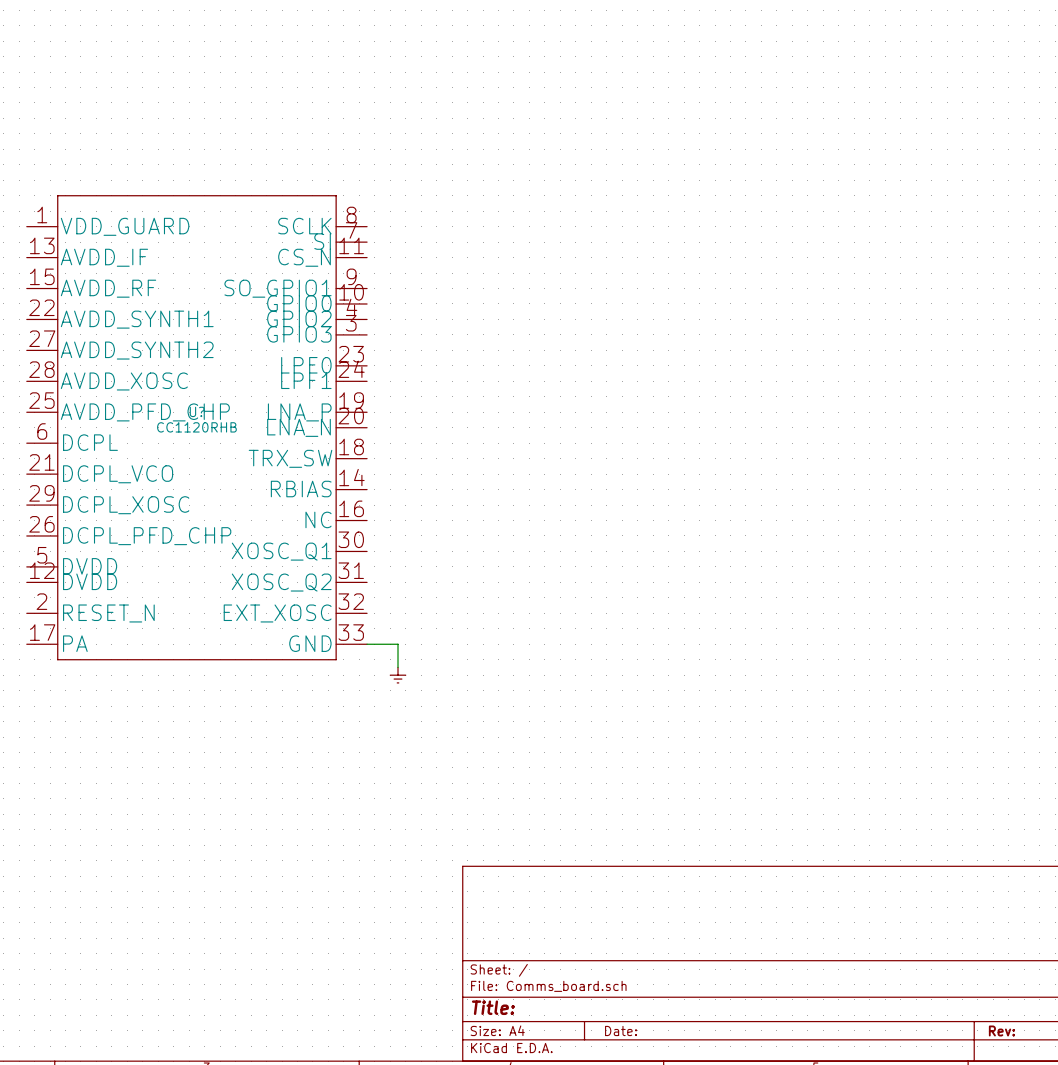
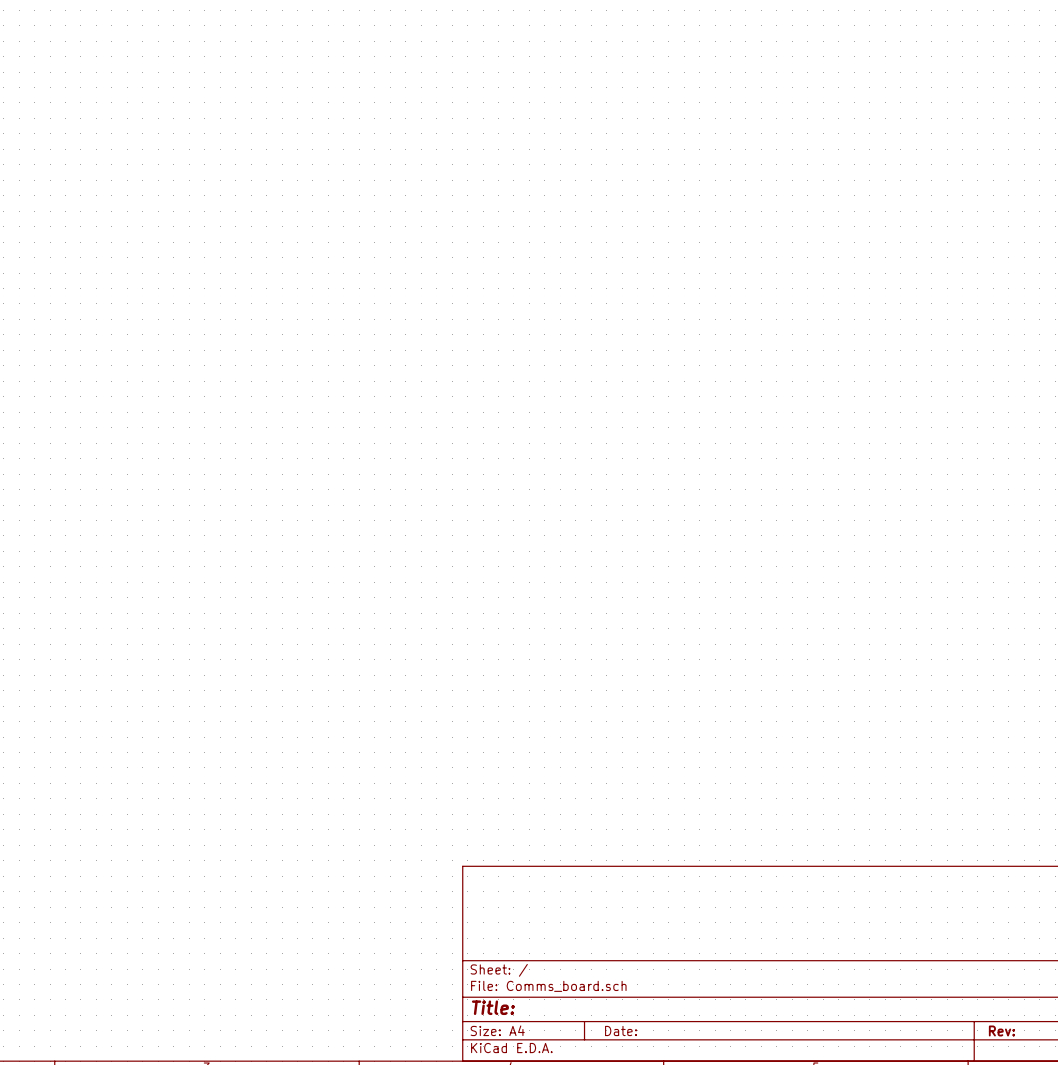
U?: CC1120RHB (196, 427) -> none
wire: (367, 644) (398, 644) (398, 667) -> none
power symbol: (398, 675) -> none

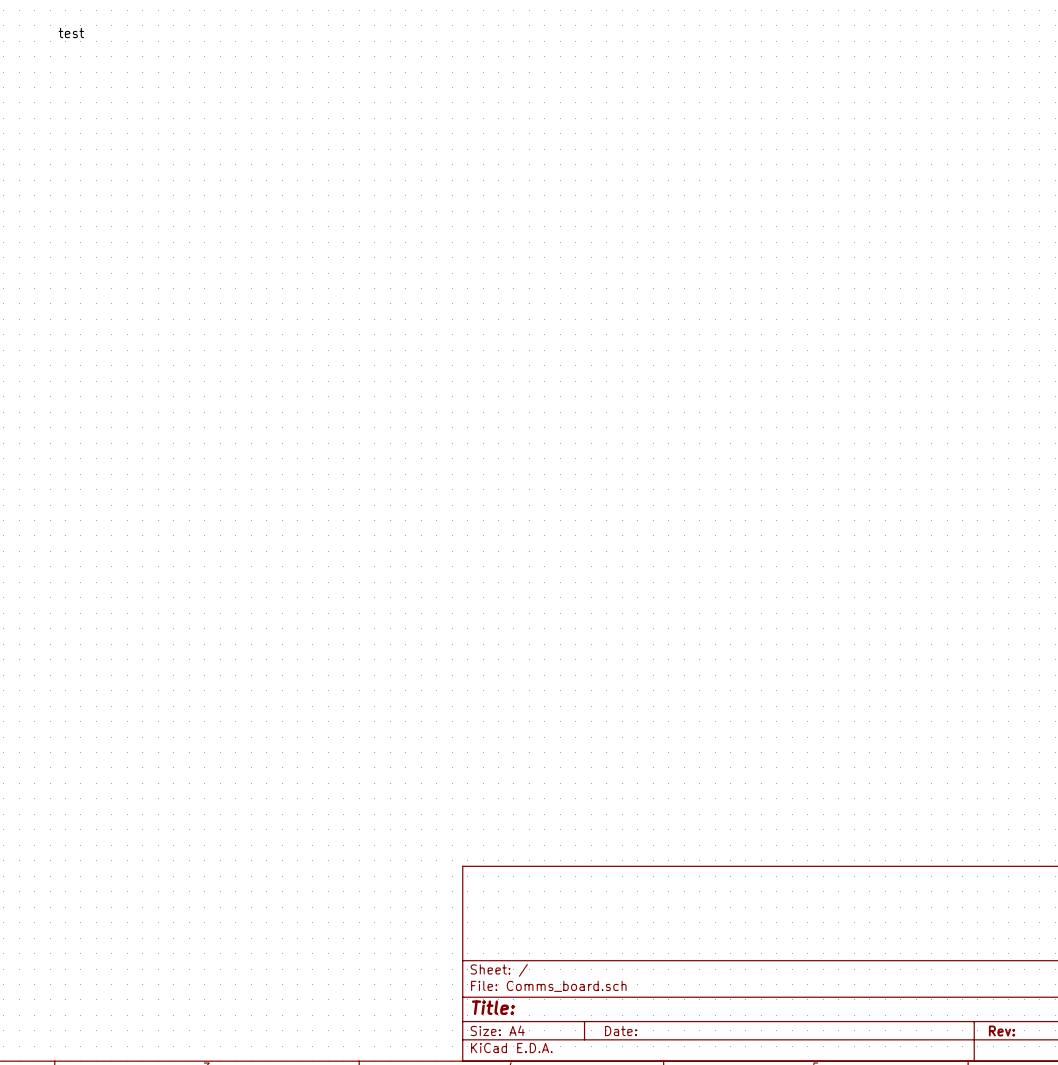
label: none -> test (71, 32)

